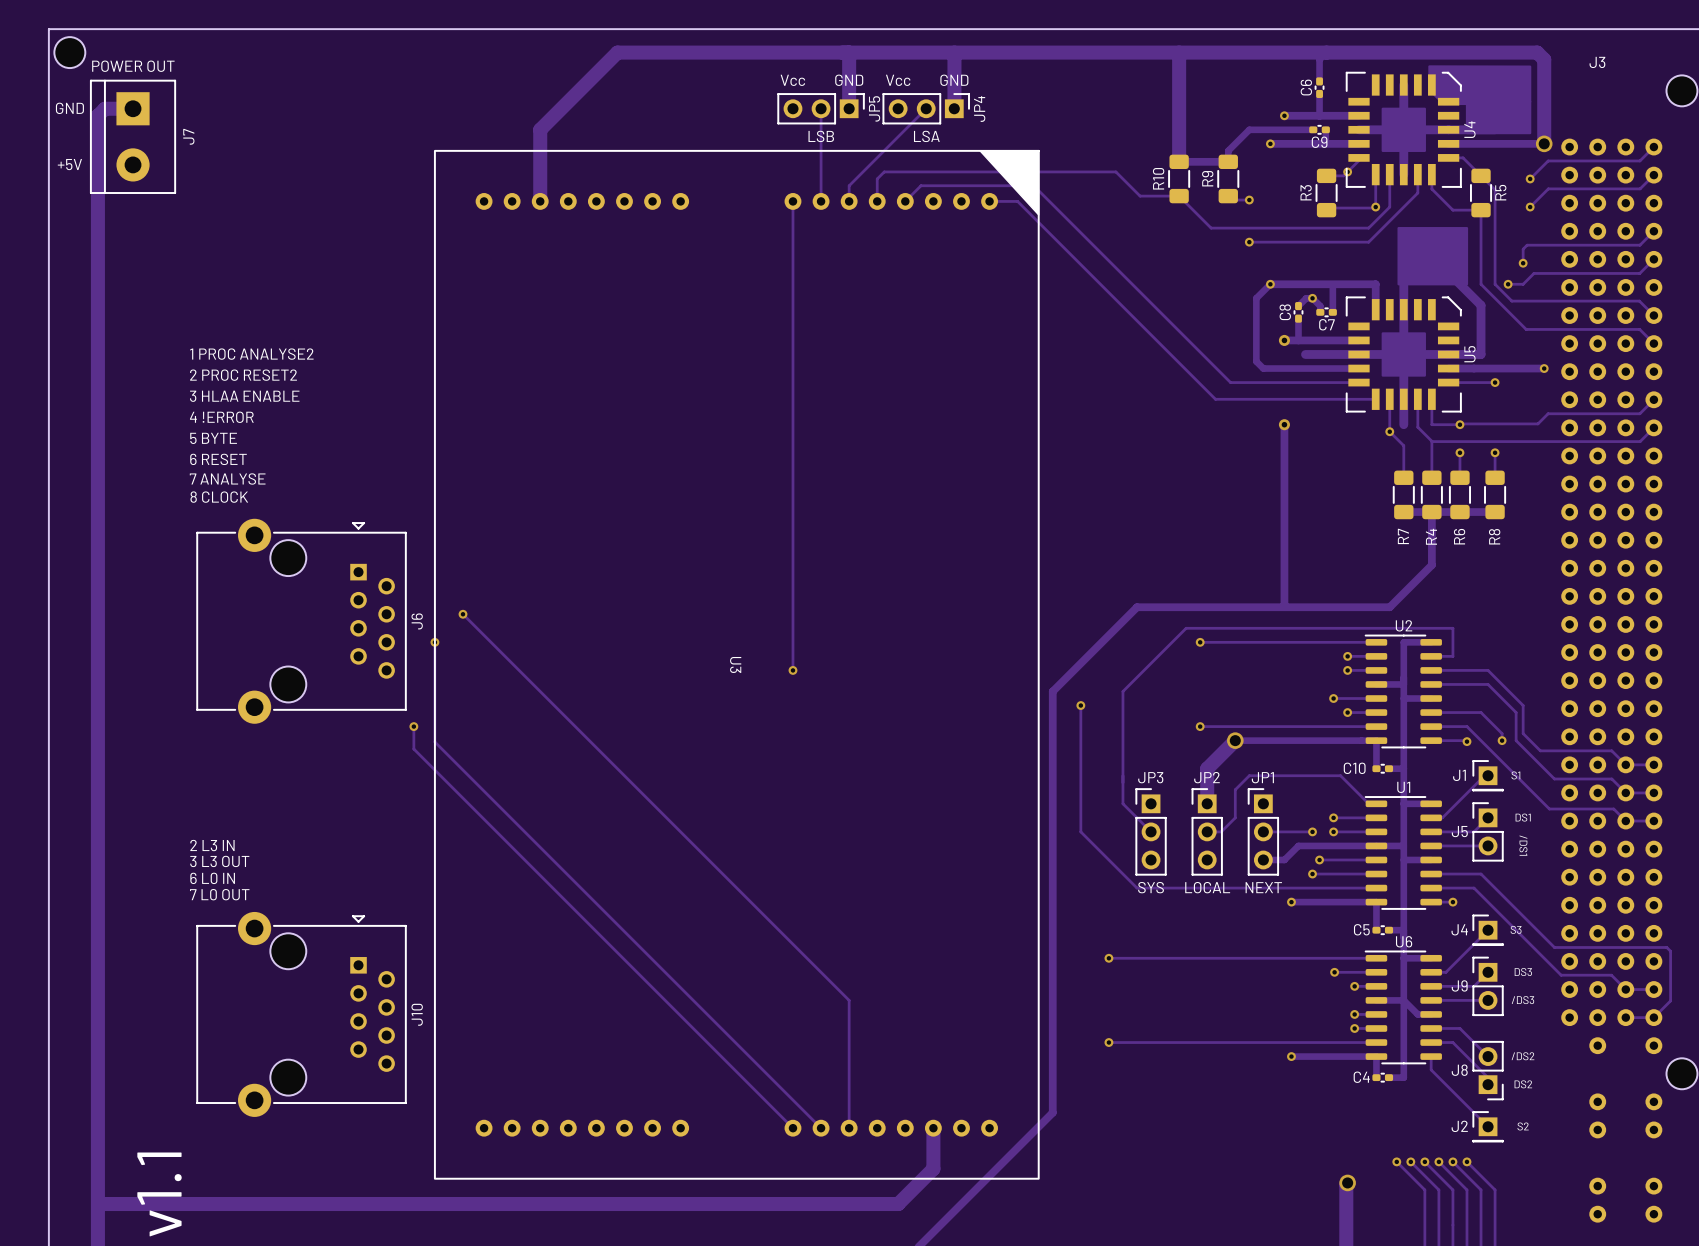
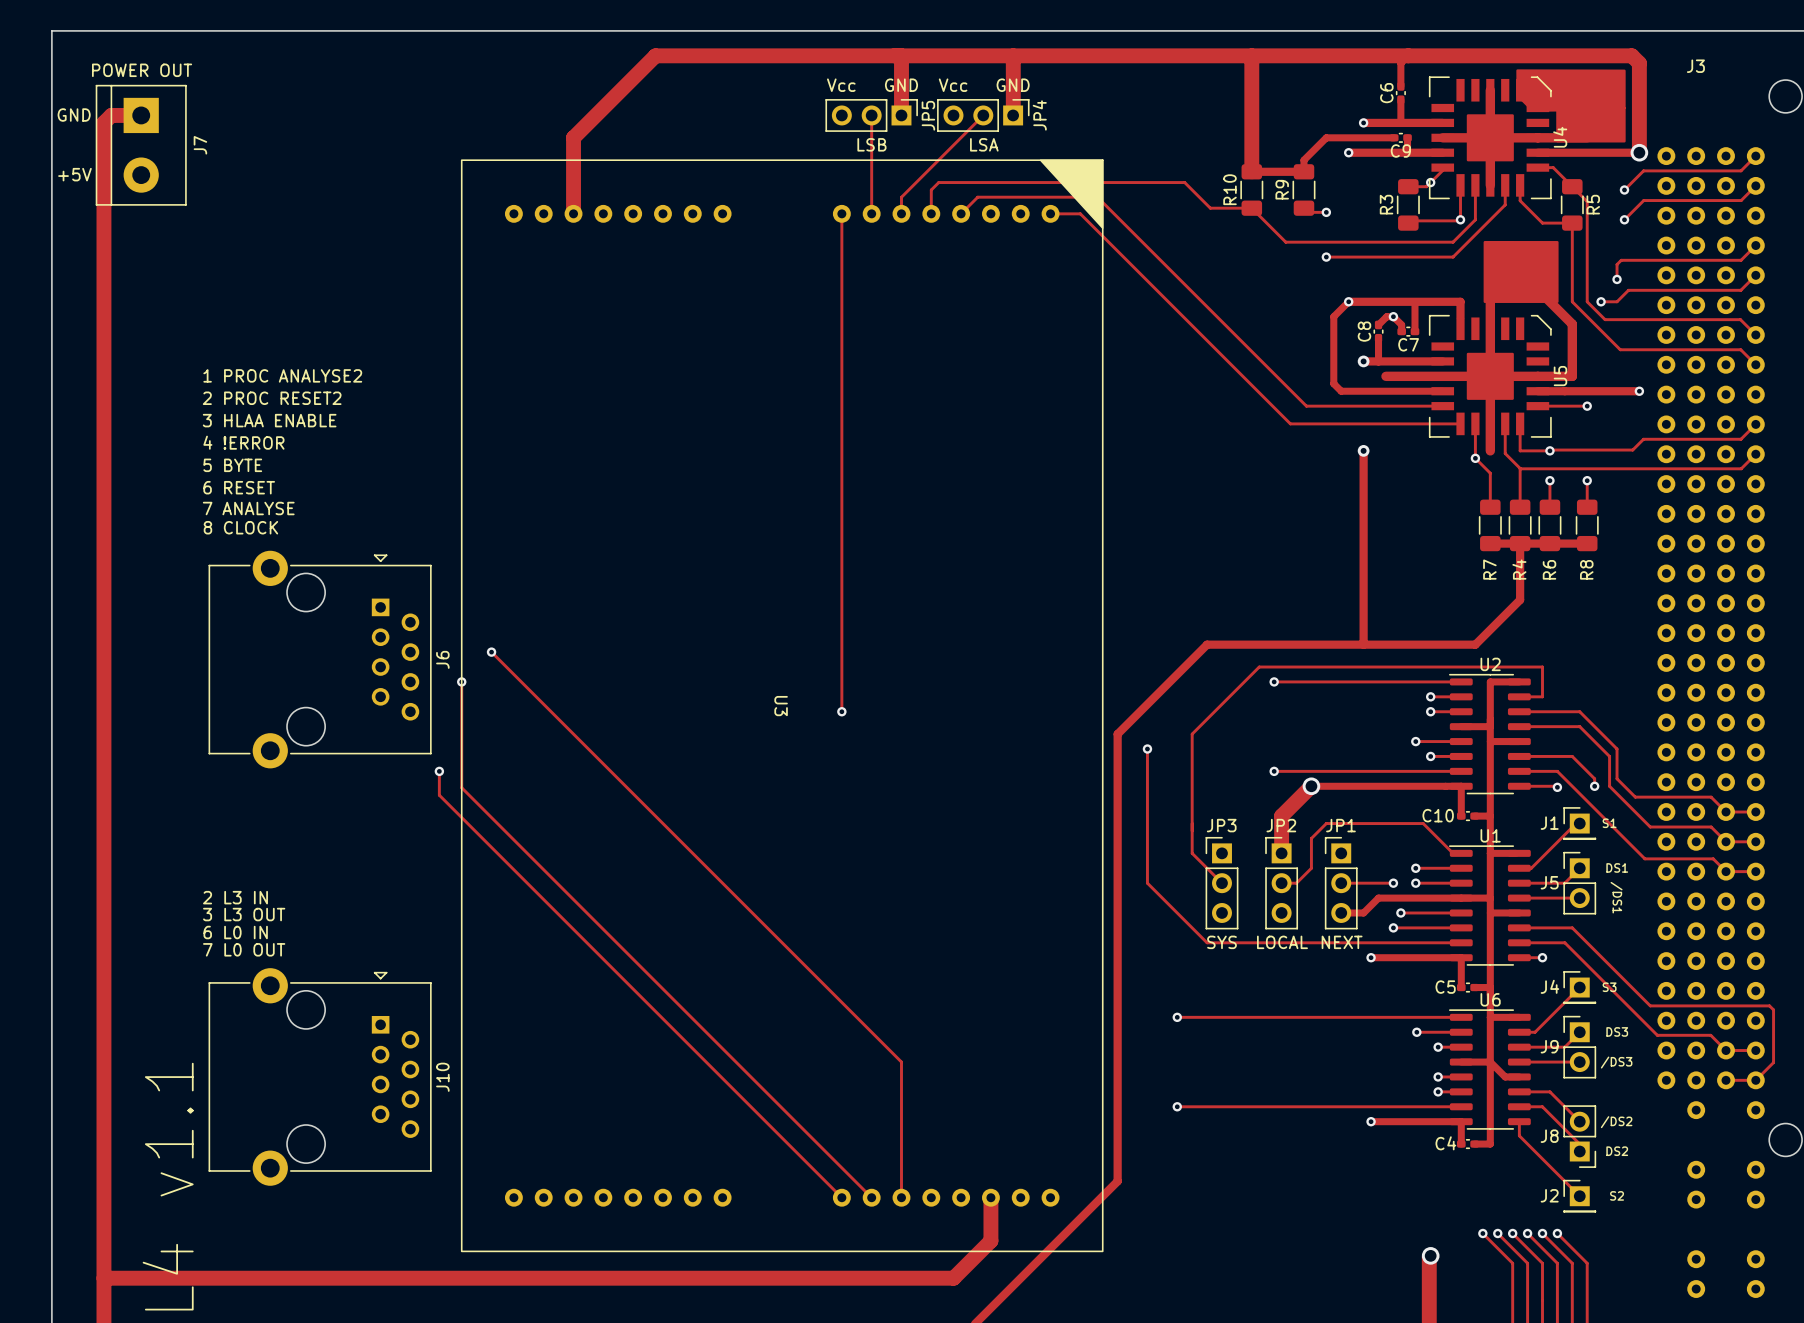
part: (69, 52) -> none

